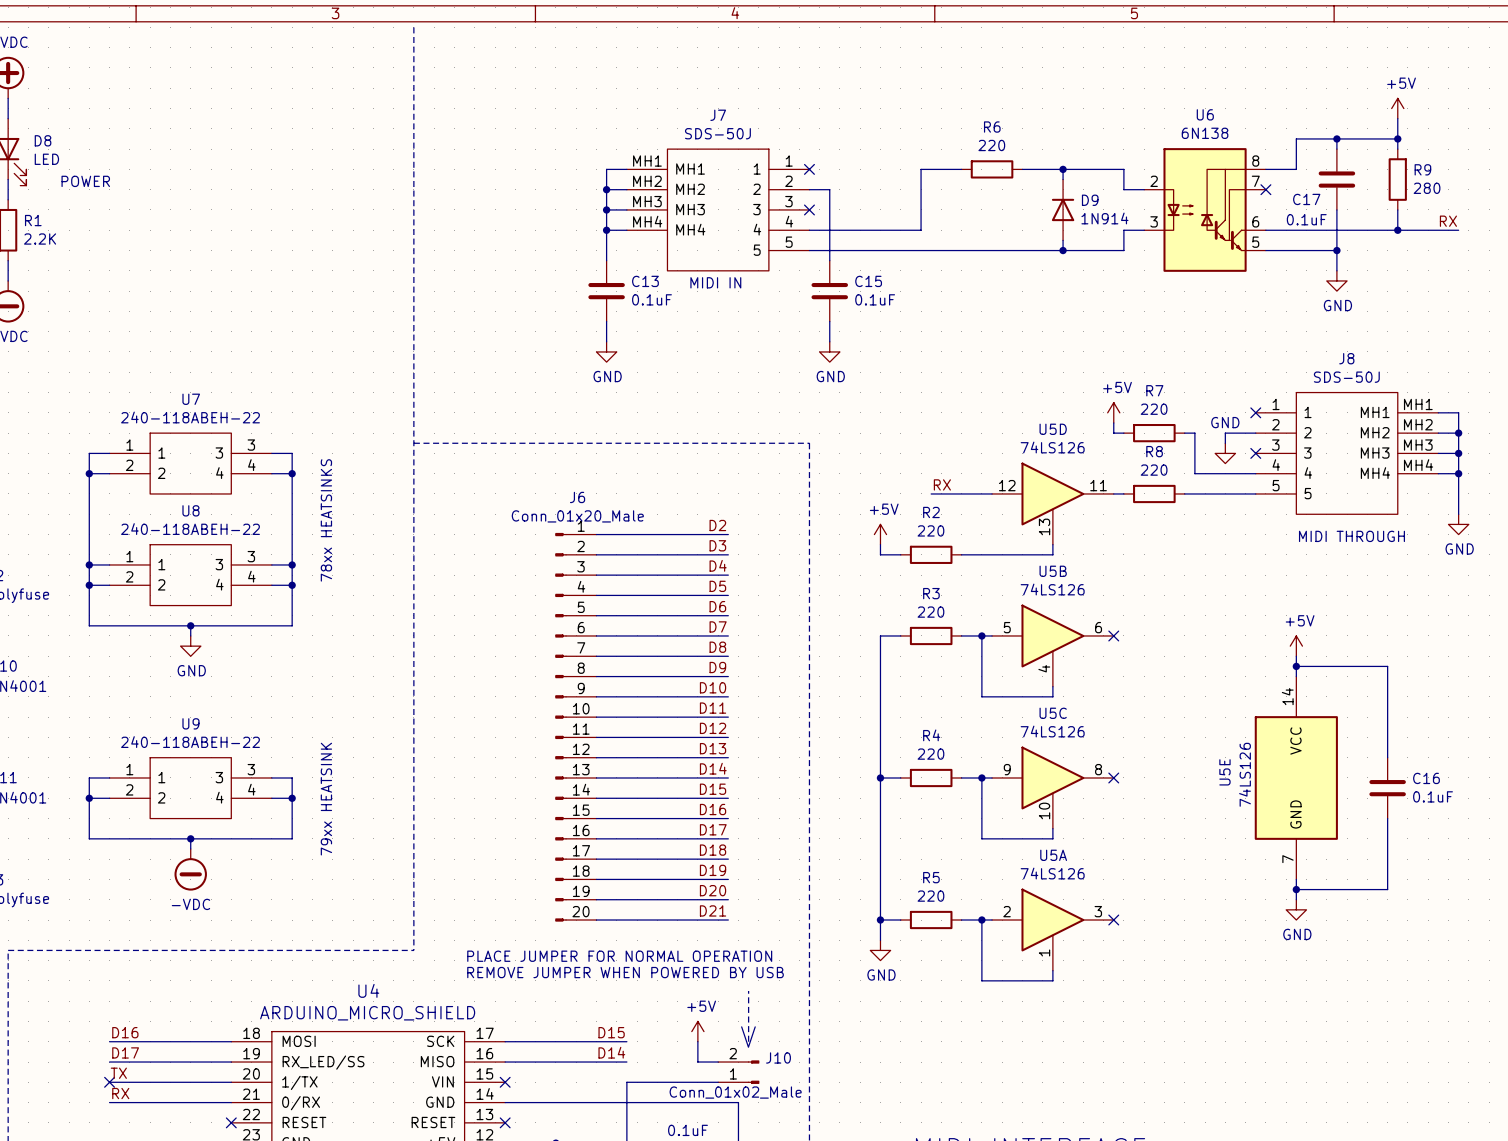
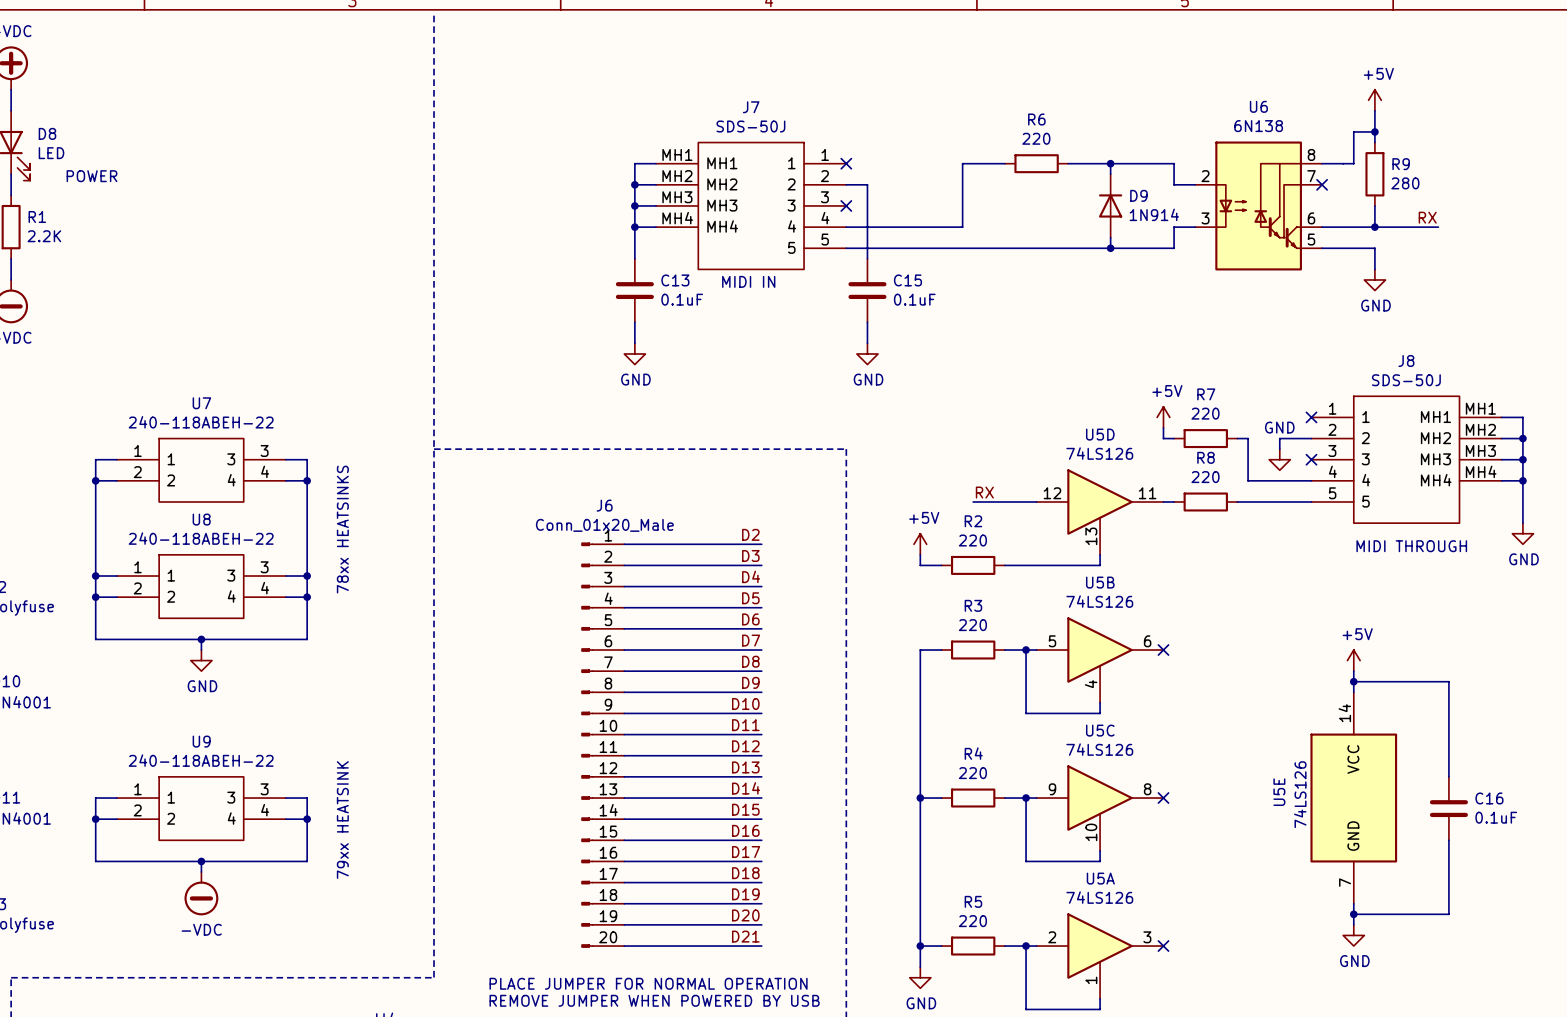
power symbol position: +5V (1397, 108) -> +5V (1374, 100)
wire: (1397, 118) (1397, 149) -> (1374, 110) (1374, 142)
wire: (1316, 138) (1397, 138) -> none
wire: (1336, 138) (1336, 149) -> none
junction position: (1336, 138) -> (1374, 131)
junction: (1397, 138) -> none
C17: 0.1uF (1336, 179) -> none
R9 position: (1397, 179) -> (1374, 174)
wire: (1336, 209) (1336, 270) -> none
wire: (1397, 209) (1397, 230) -> (1374, 205) (1374, 227)
label position: RX (1448, 221) -> RX (1427, 217)
wire: (1377, 230) (1458, 230) -> none
junction: (1397, 230) -> none
wire: (1316, 250) (1336, 250) -> (1374, 248) (1374, 269)
junction position: (1336, 250) -> (1374, 227)
power symbol position: GND (1336, 280) -> GND (1374, 279)

